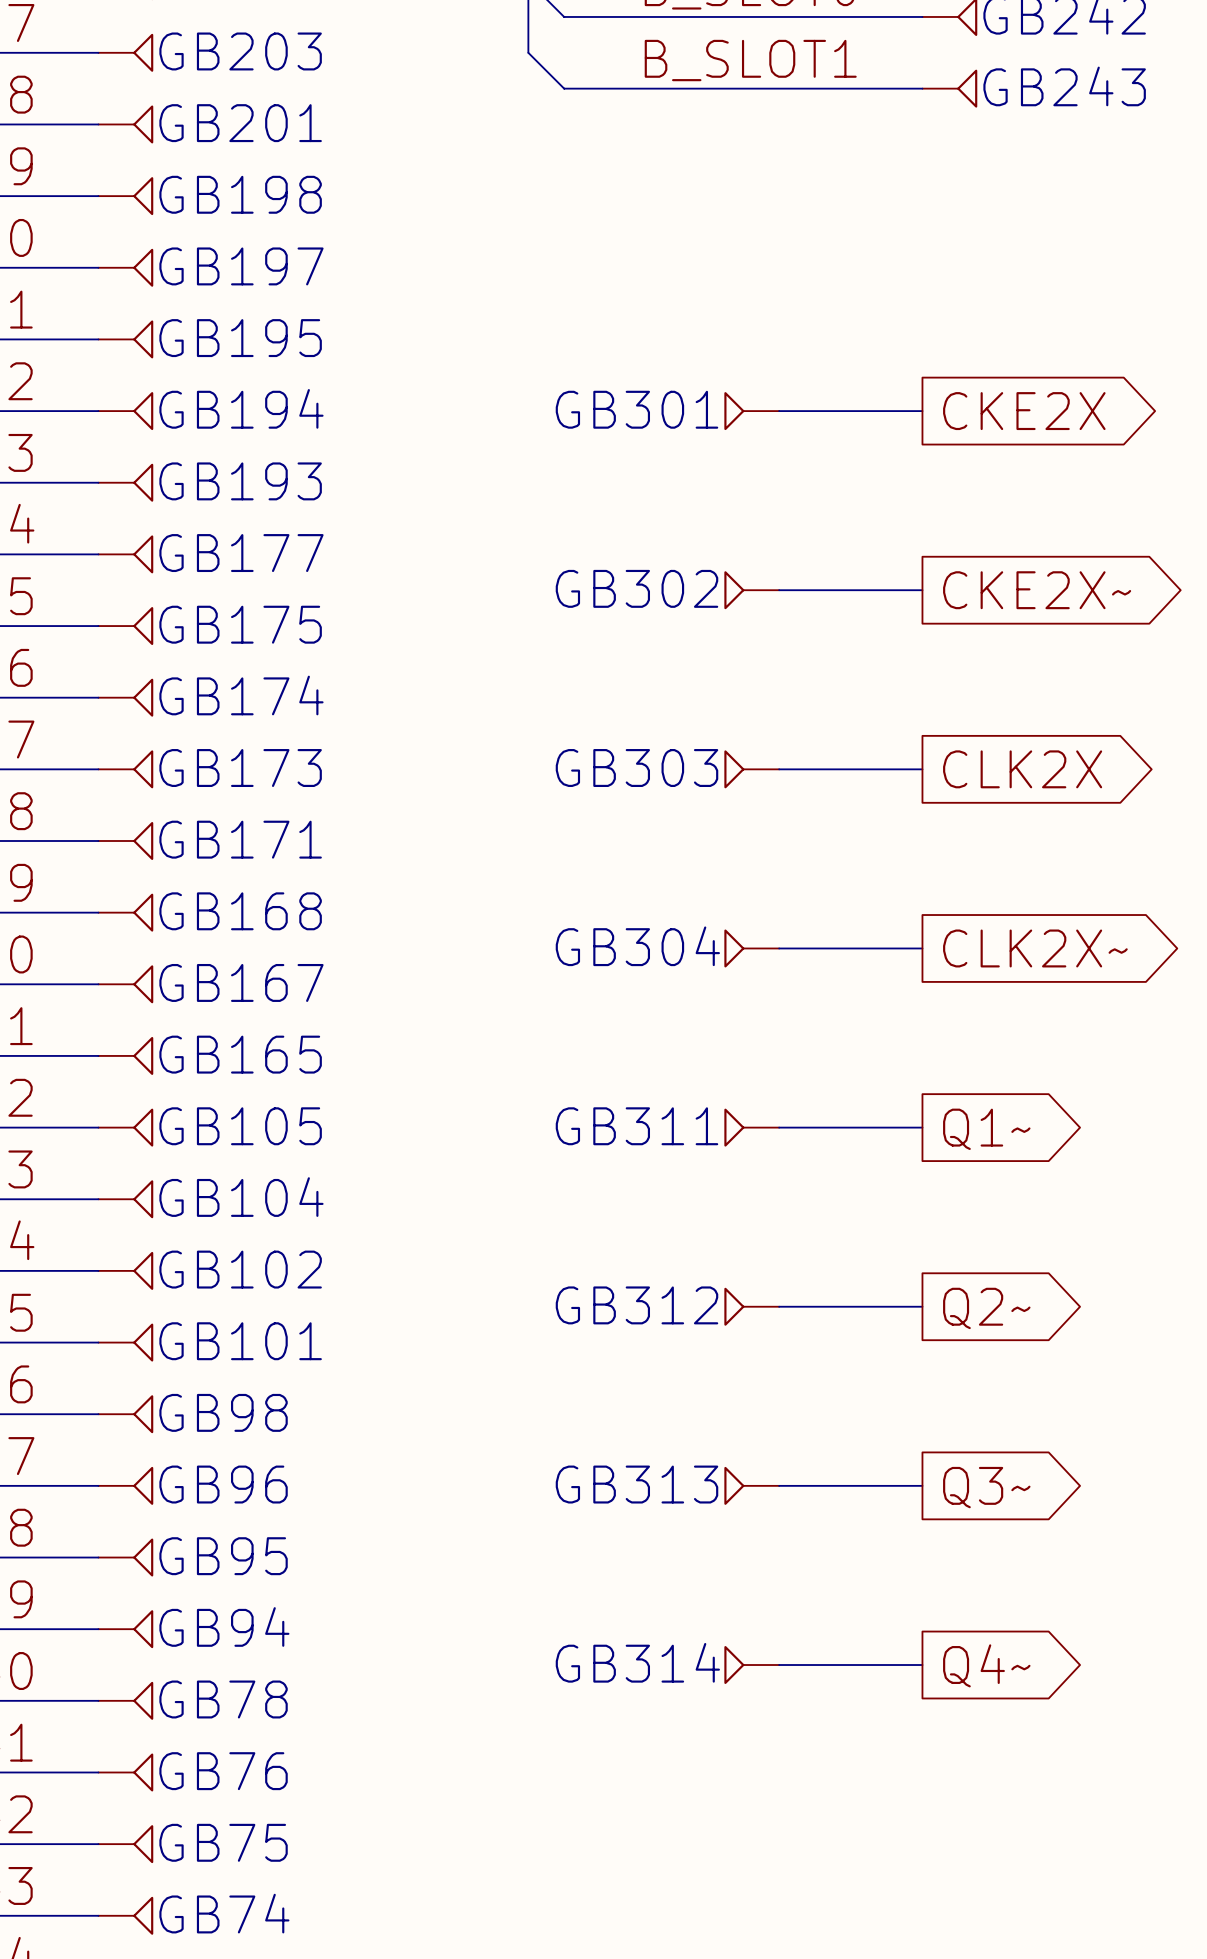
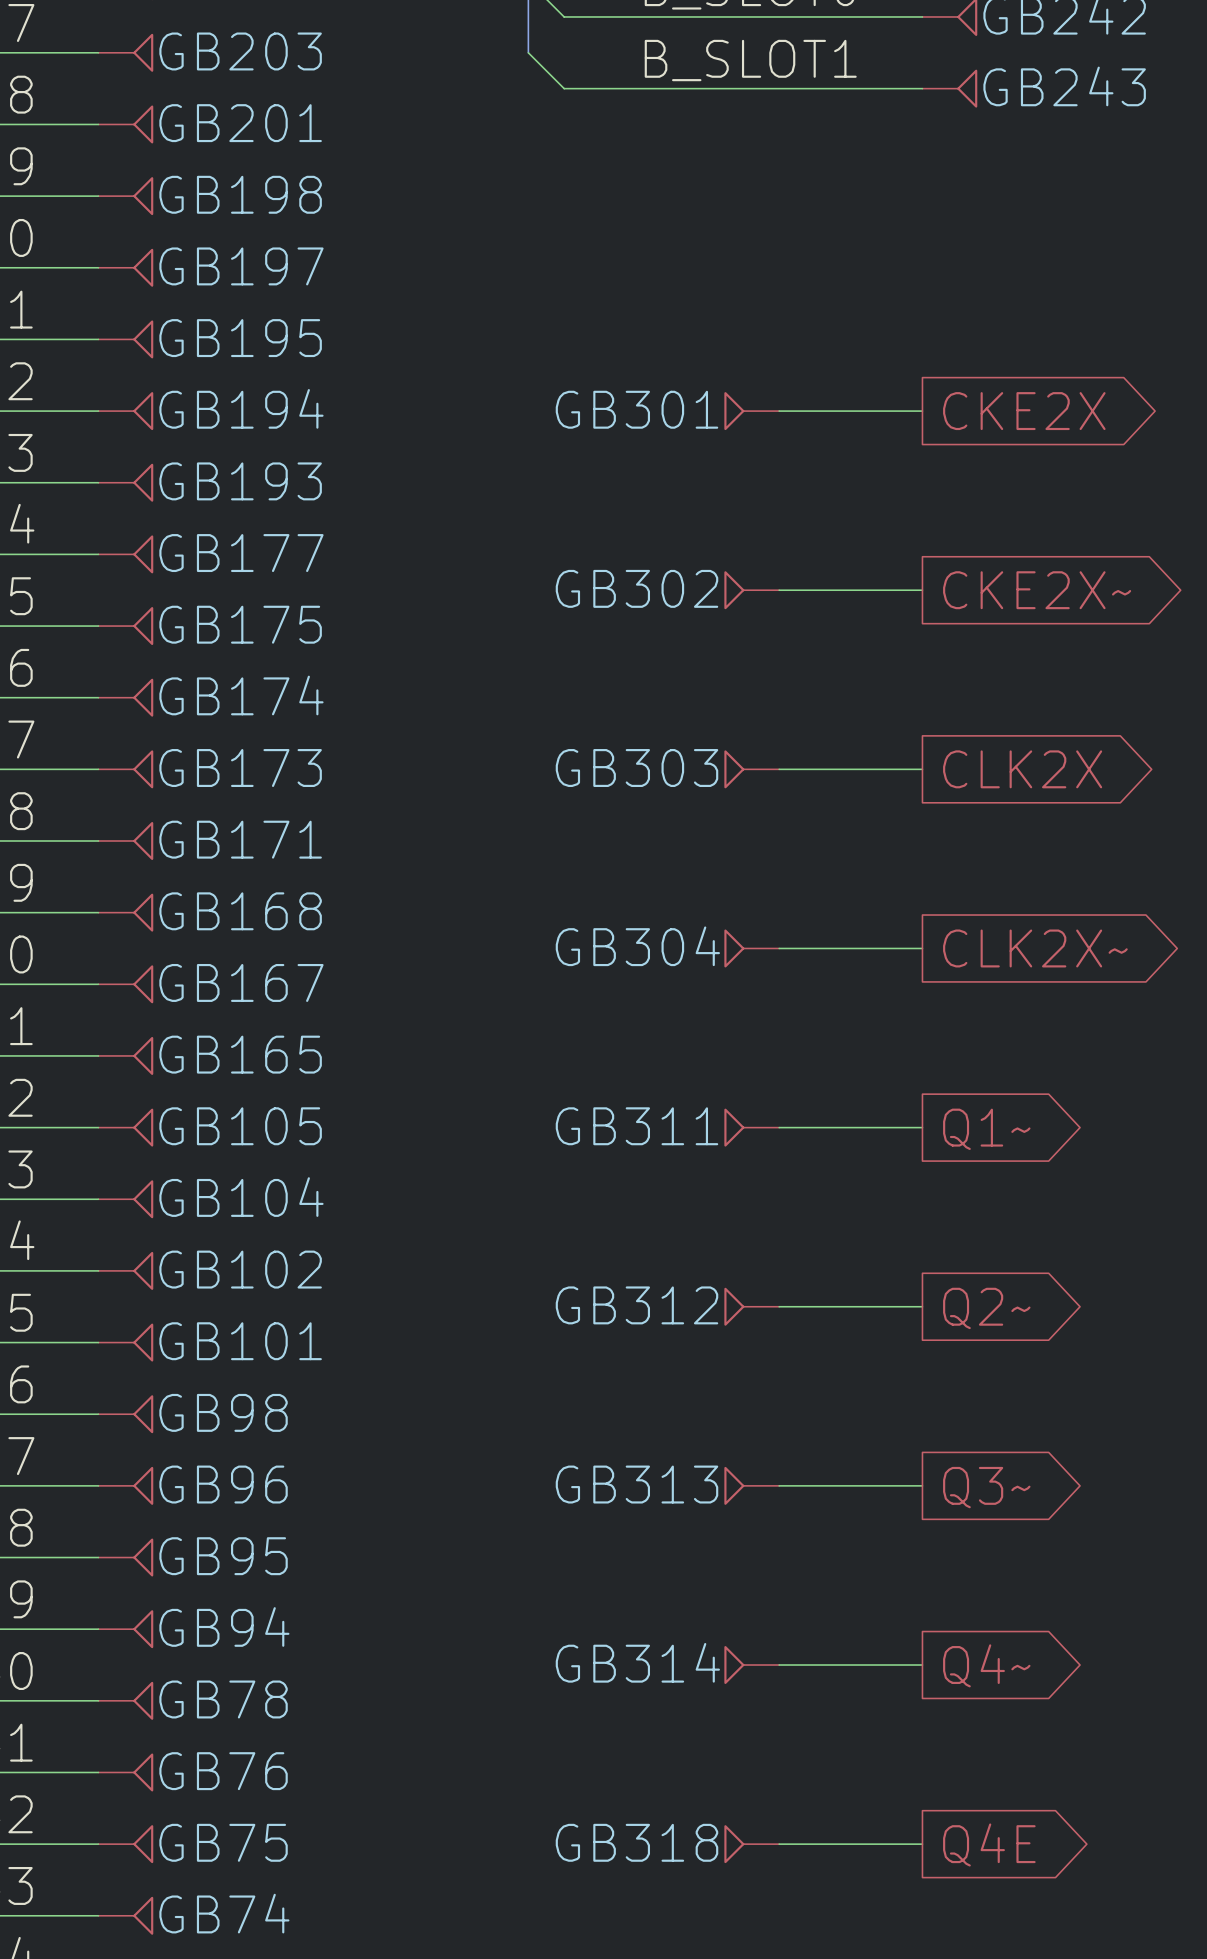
GB318: none -> (751, 1844)
wire: none -> (779, 1844) (922, 1844)
global label: none -> Q4E (989, 1844)

